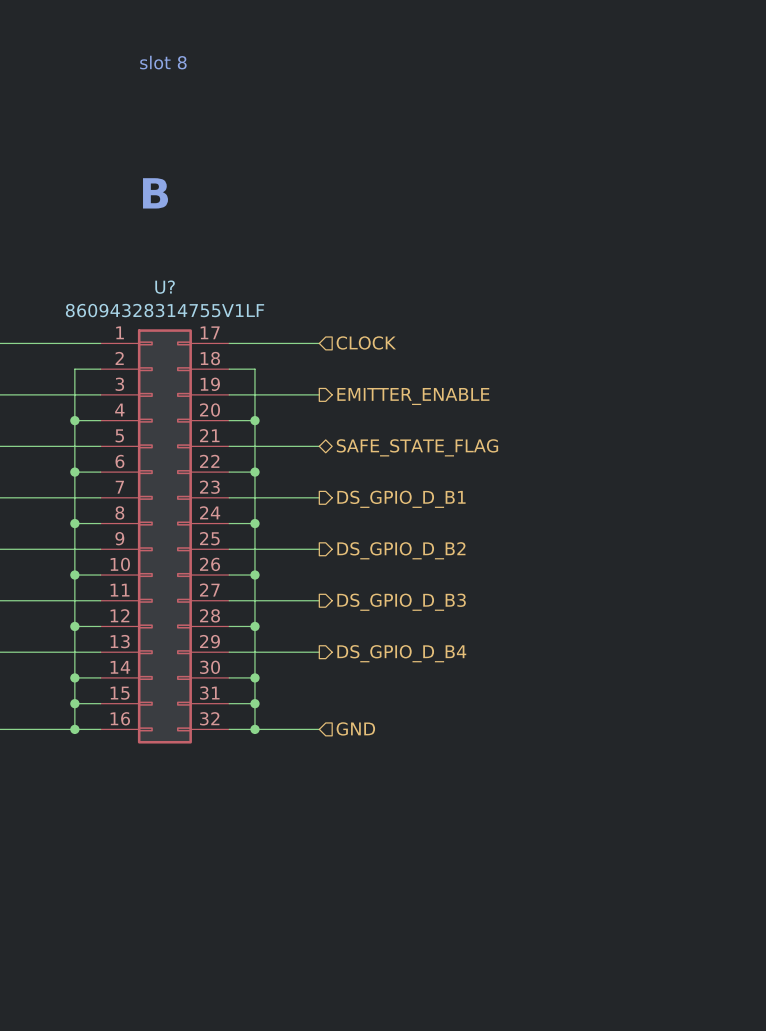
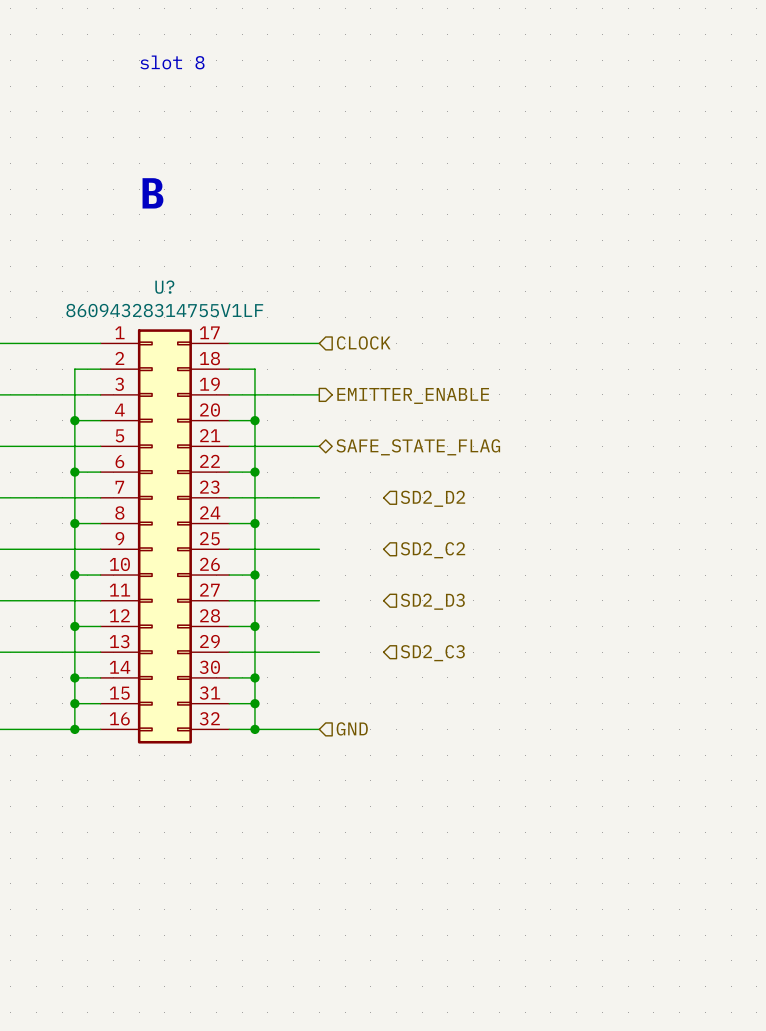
hierarchical label: DS_GPIO_D_B1 (401, 499) -> none
hierarchical label: none -> SD2_D2 (432, 498)
hierarchical label: DS_GPIO_D_B2 (401, 550) -> none
hierarchical label: none -> SD2_C2 (432, 550)
hierarchical label: DS_GPIO_D_B3 (401, 602) -> none
hierarchical label: none -> SD2_D3 (432, 601)
hierarchical label: DS_GPIO_D_B4 (401, 653) -> none
hierarchical label: none -> SD2_C3 (432, 653)

